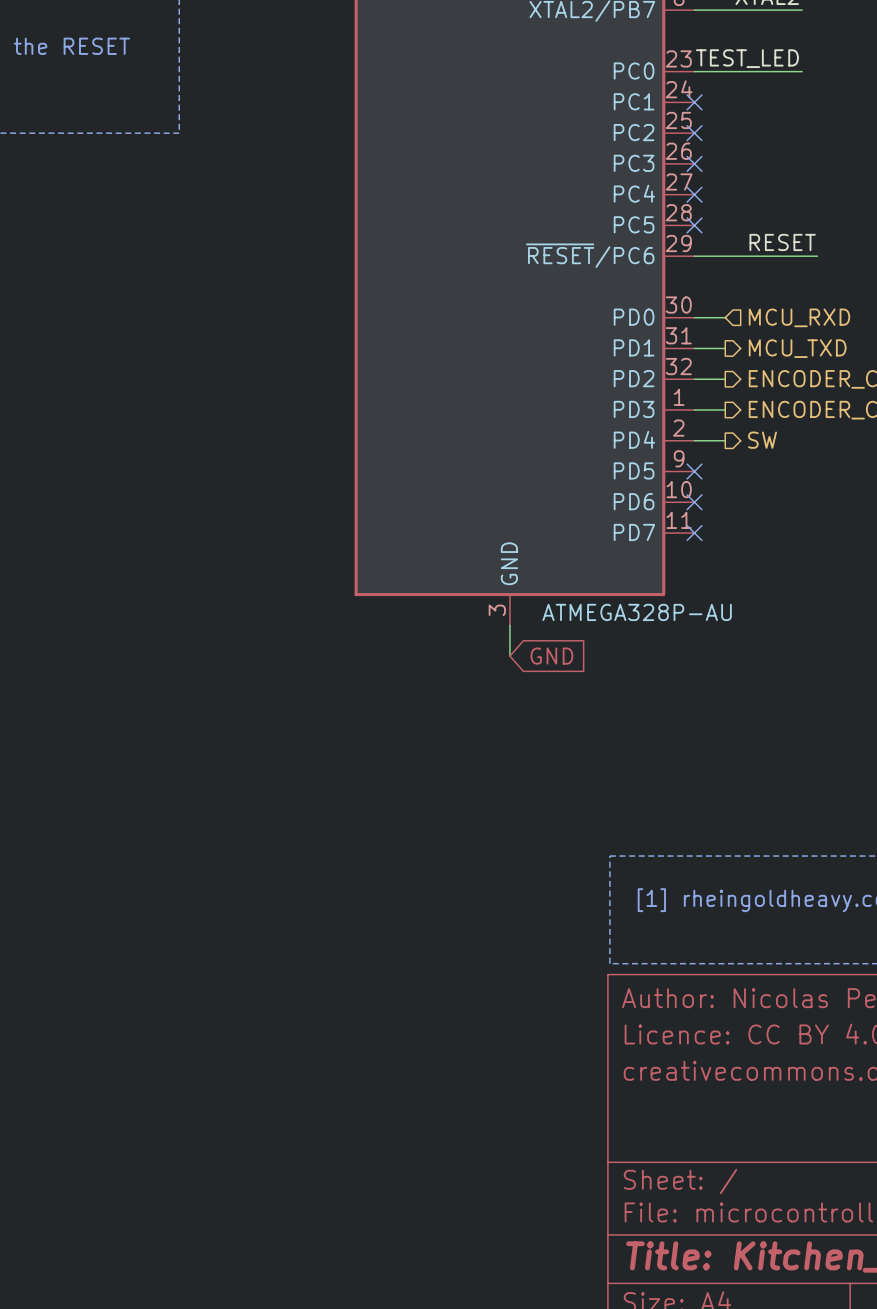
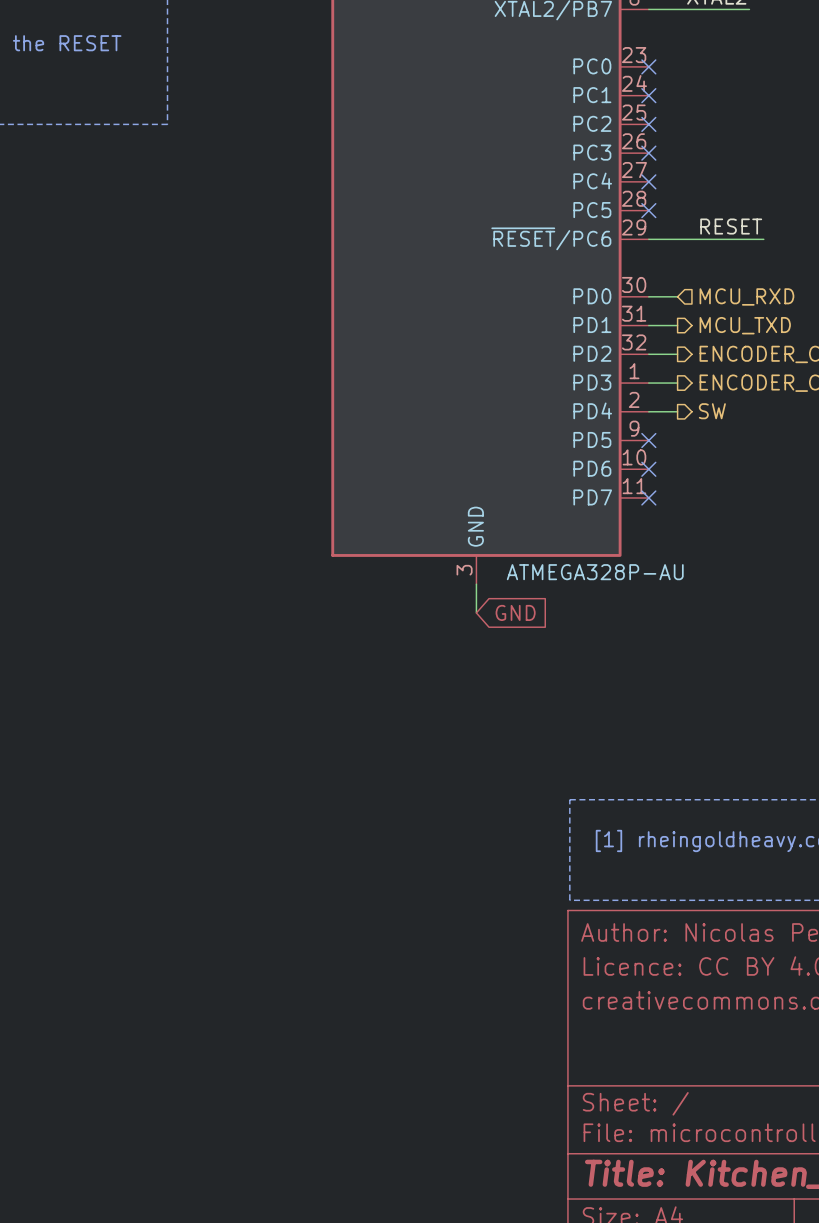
label: TEST_LED (747, 58) -> none
wire: (694, 71) (802, 71) -> none
no-connect mark: none -> (648, 66)

